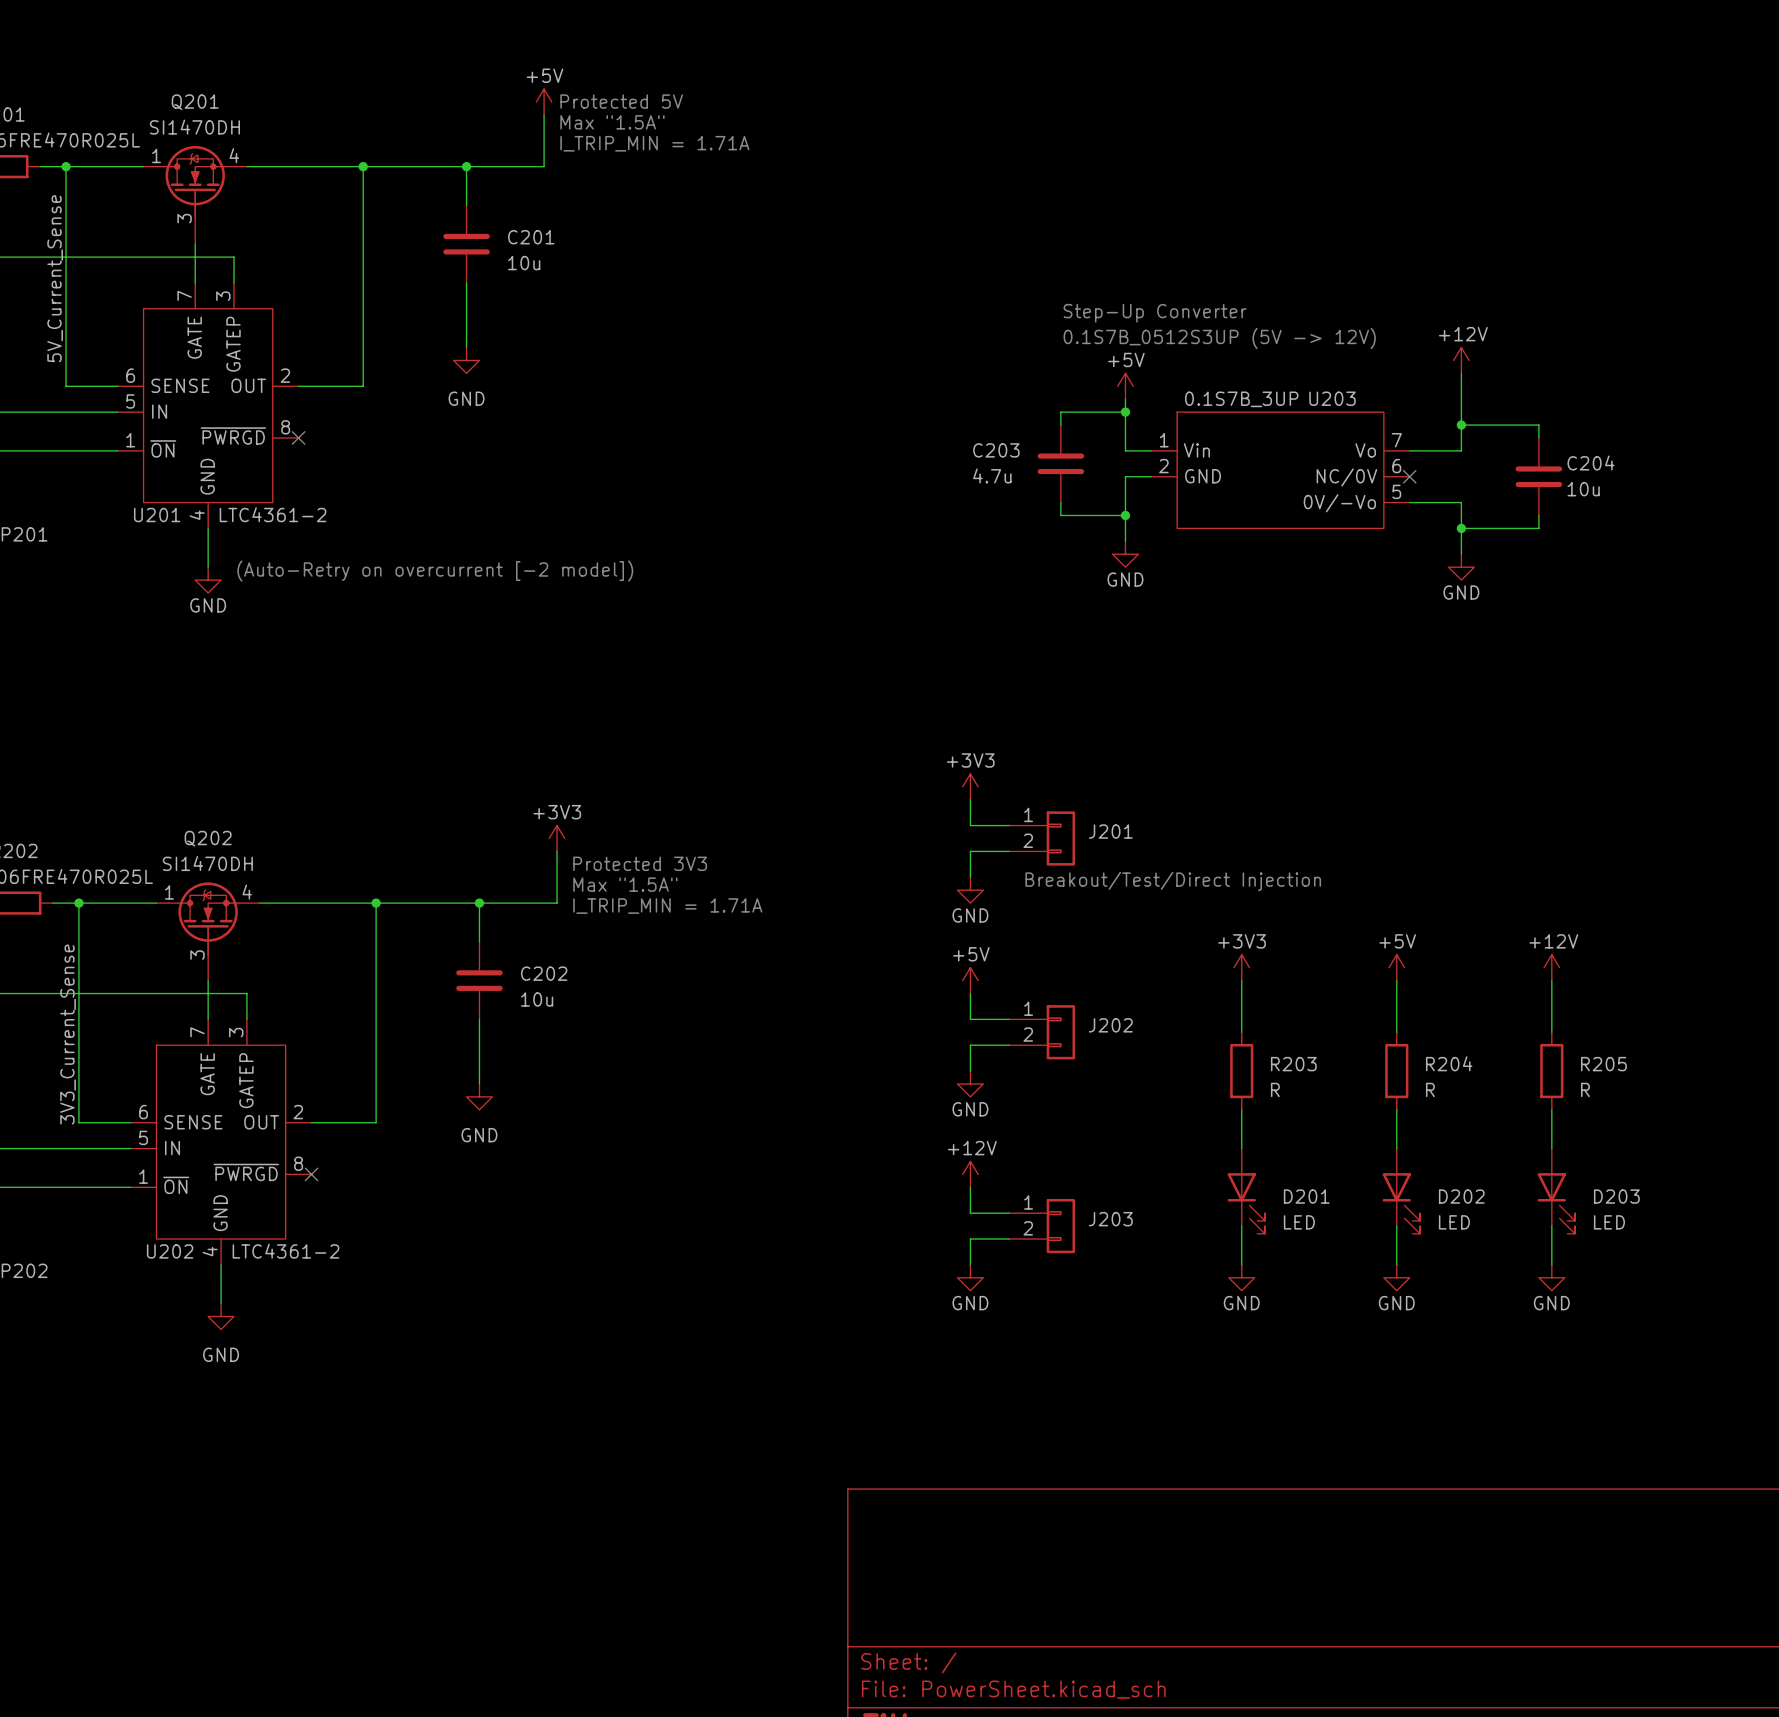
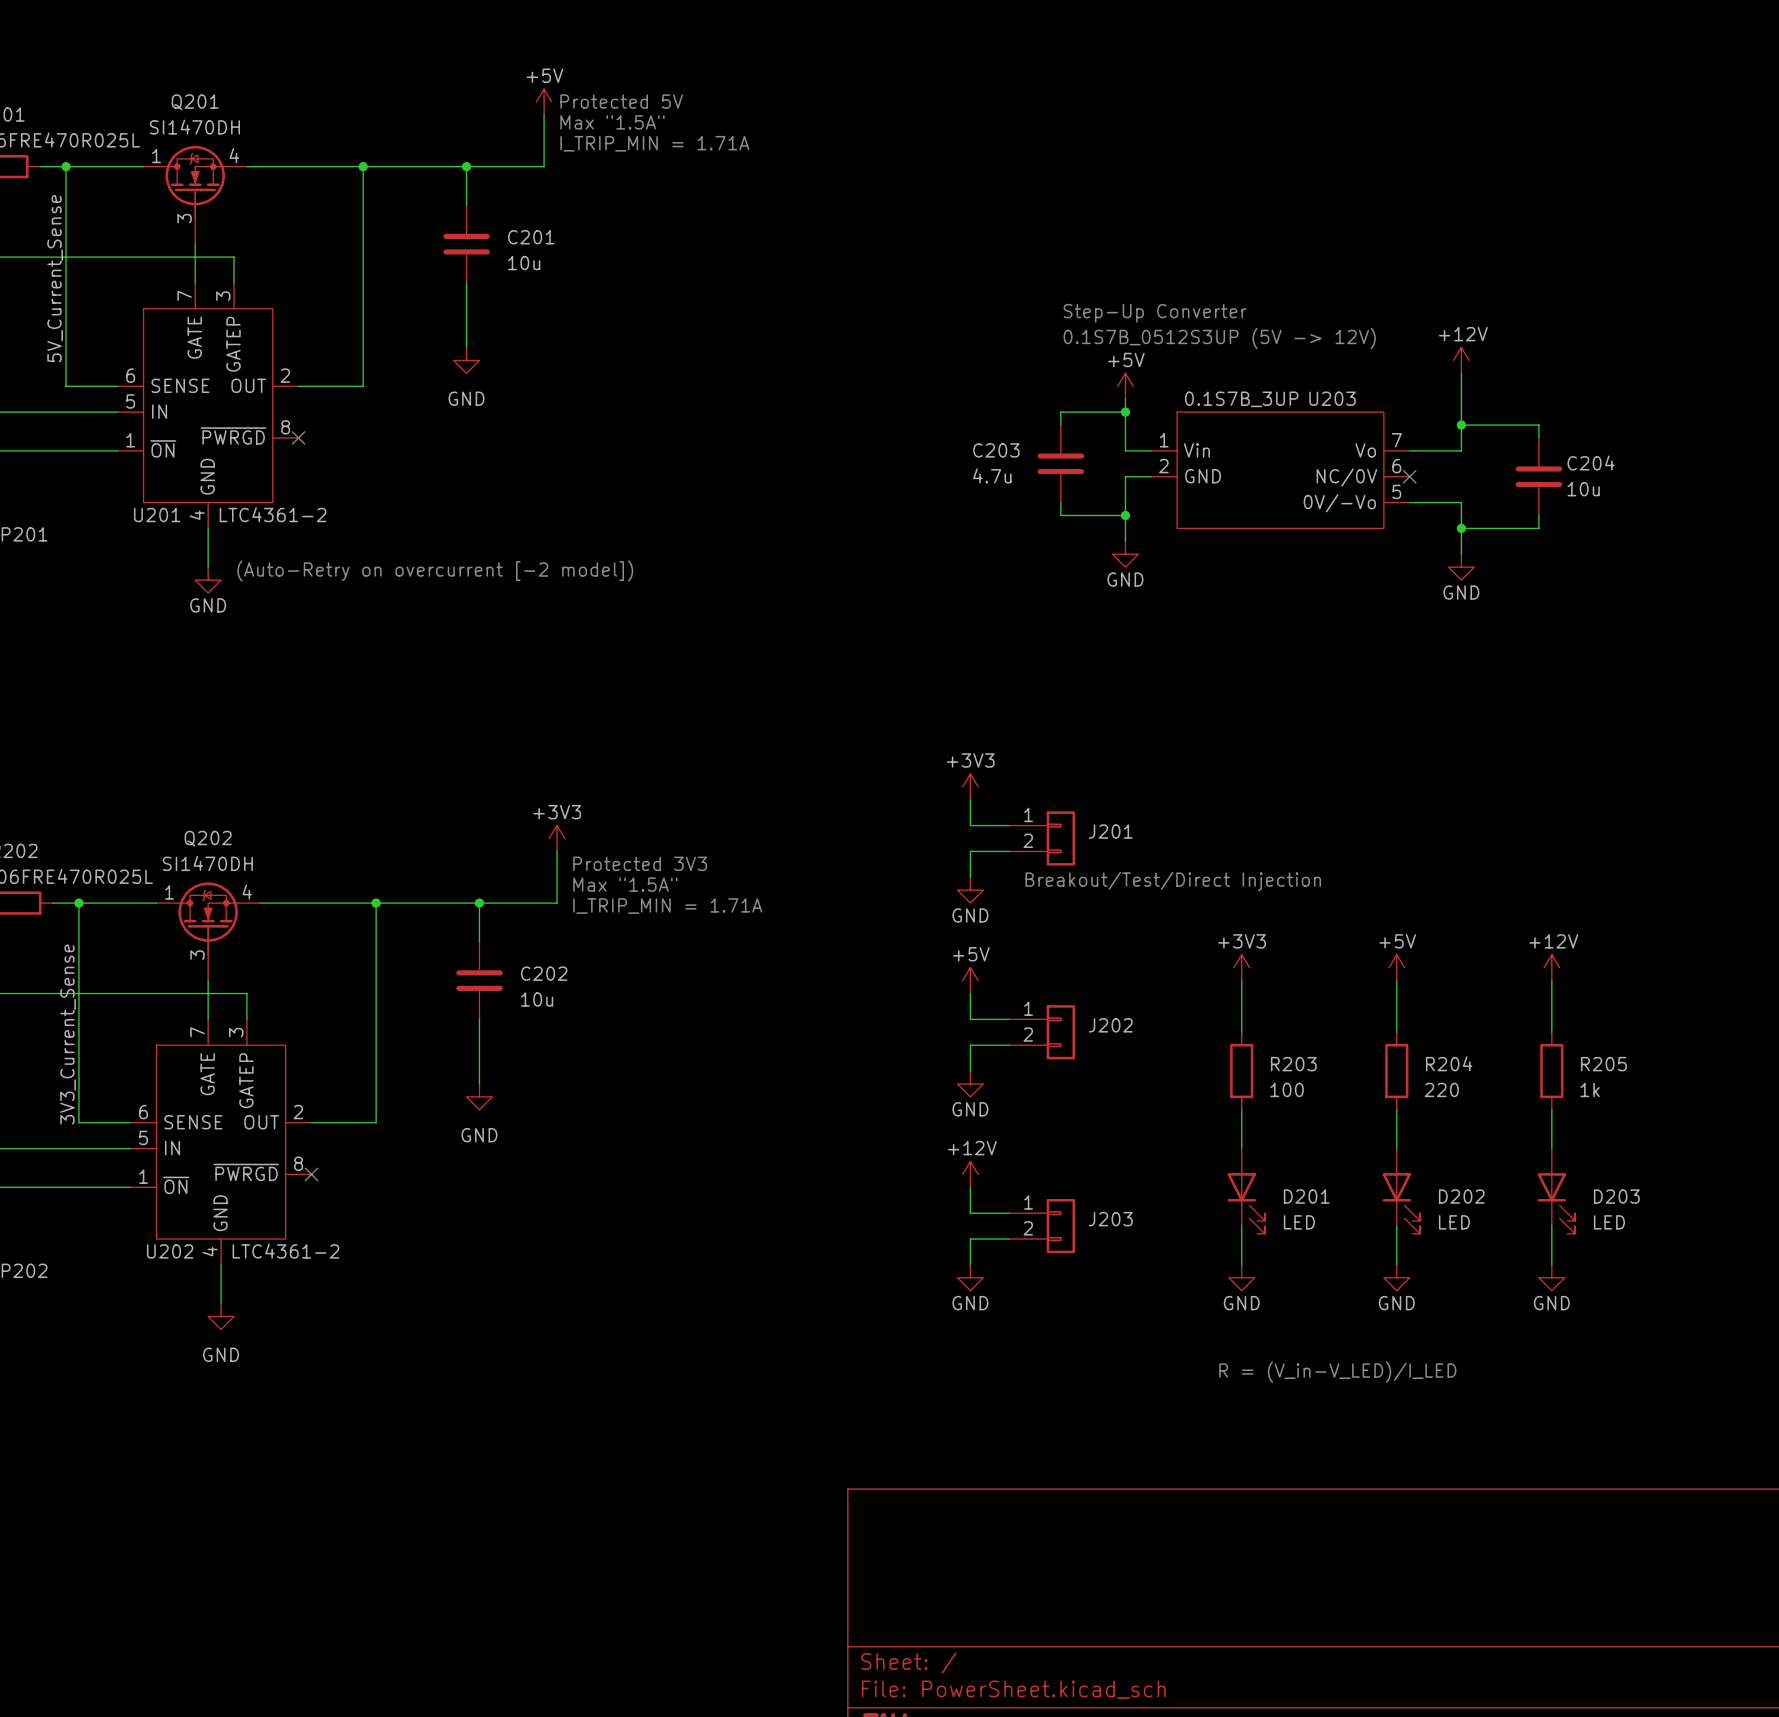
R203 value: R (1275, 1089) -> 100 (1287, 1089)
R204 value: R (1430, 1089) -> 220 (1441, 1089)
R205 value: R (1585, 1089) -> 1k (1590, 1089)
text: none -> R = (V_in-V_LED)/I_LED (1337, 1372)

